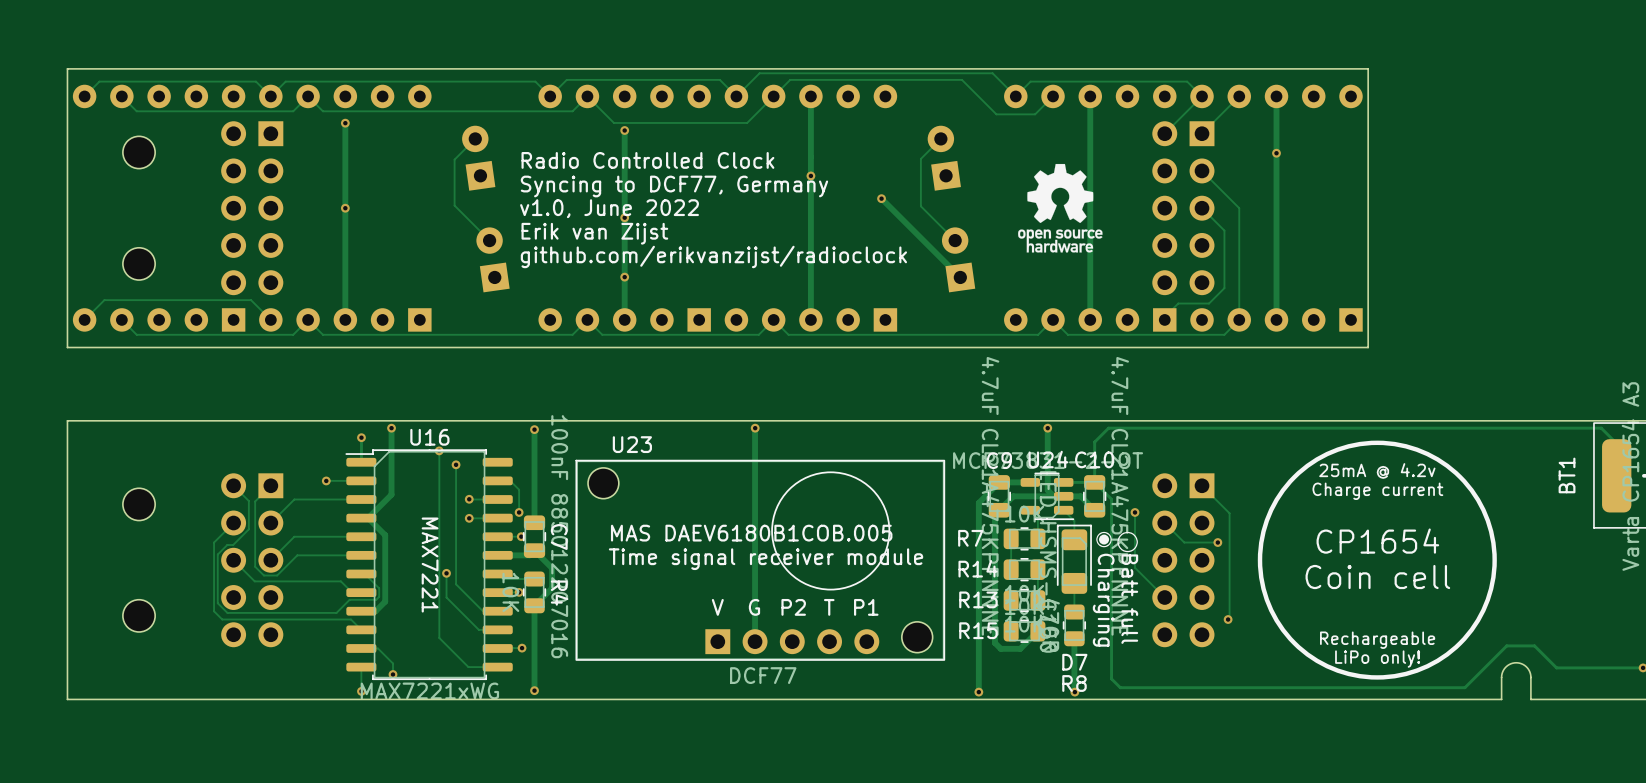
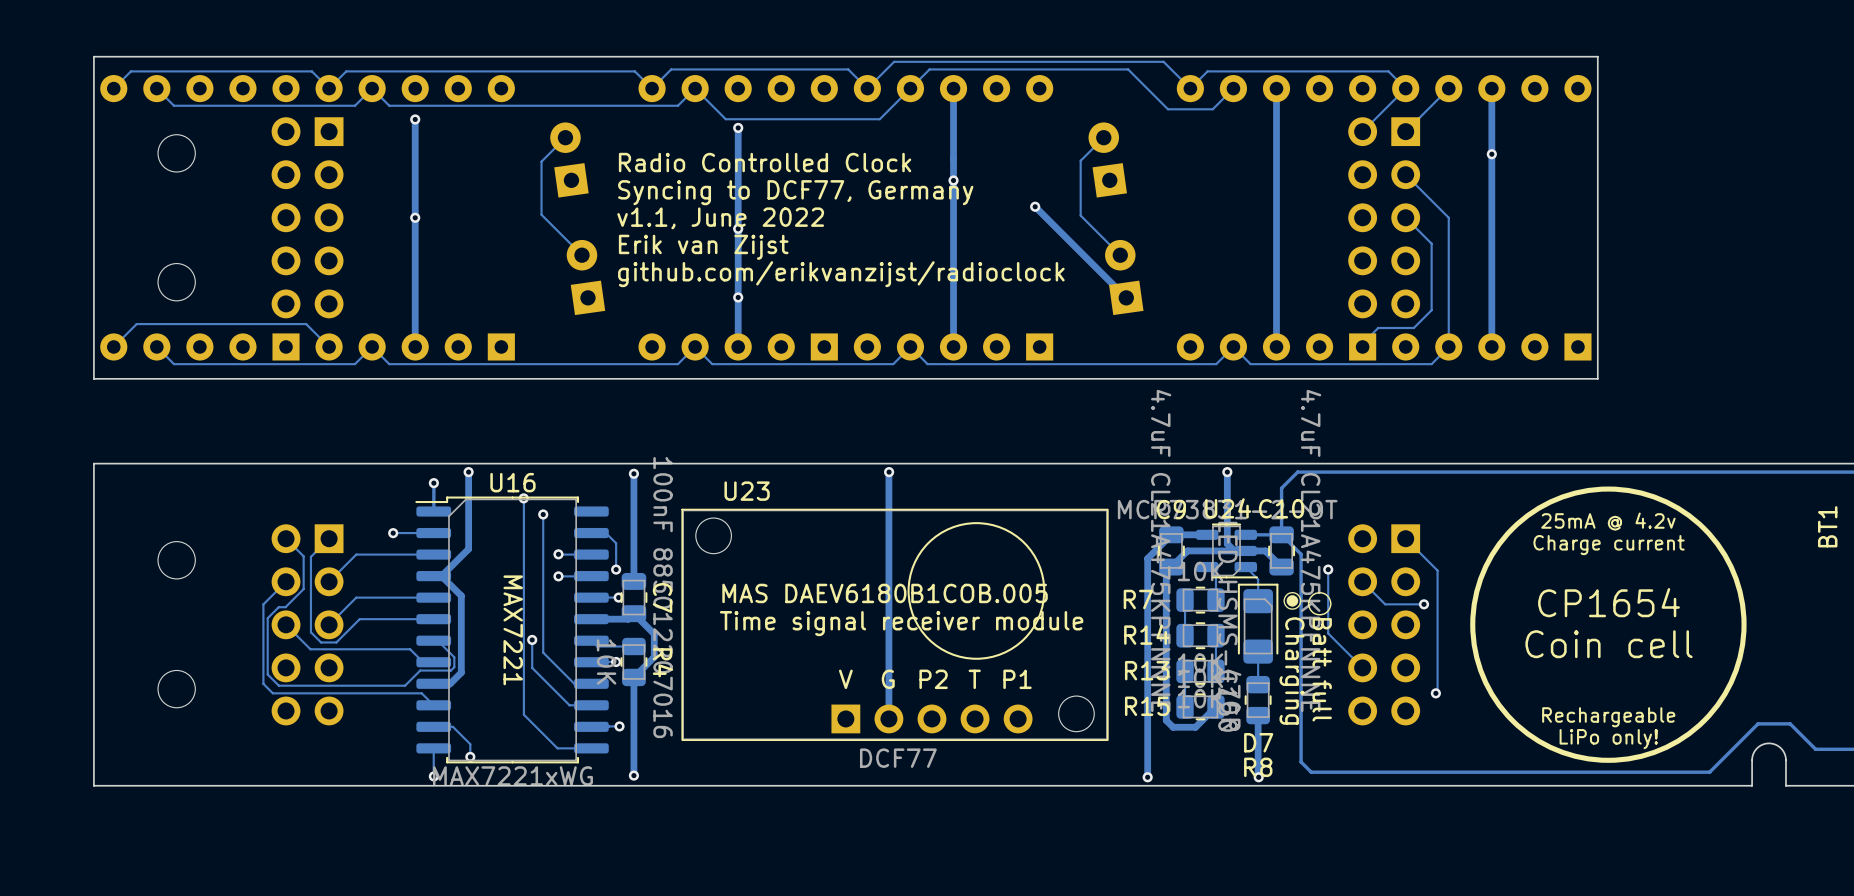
drawing: [1018, 163, 1103, 253] -> none
text: v1.0, June 2022 (609, 208) -> v1.1, June 2022 (720, 218)

